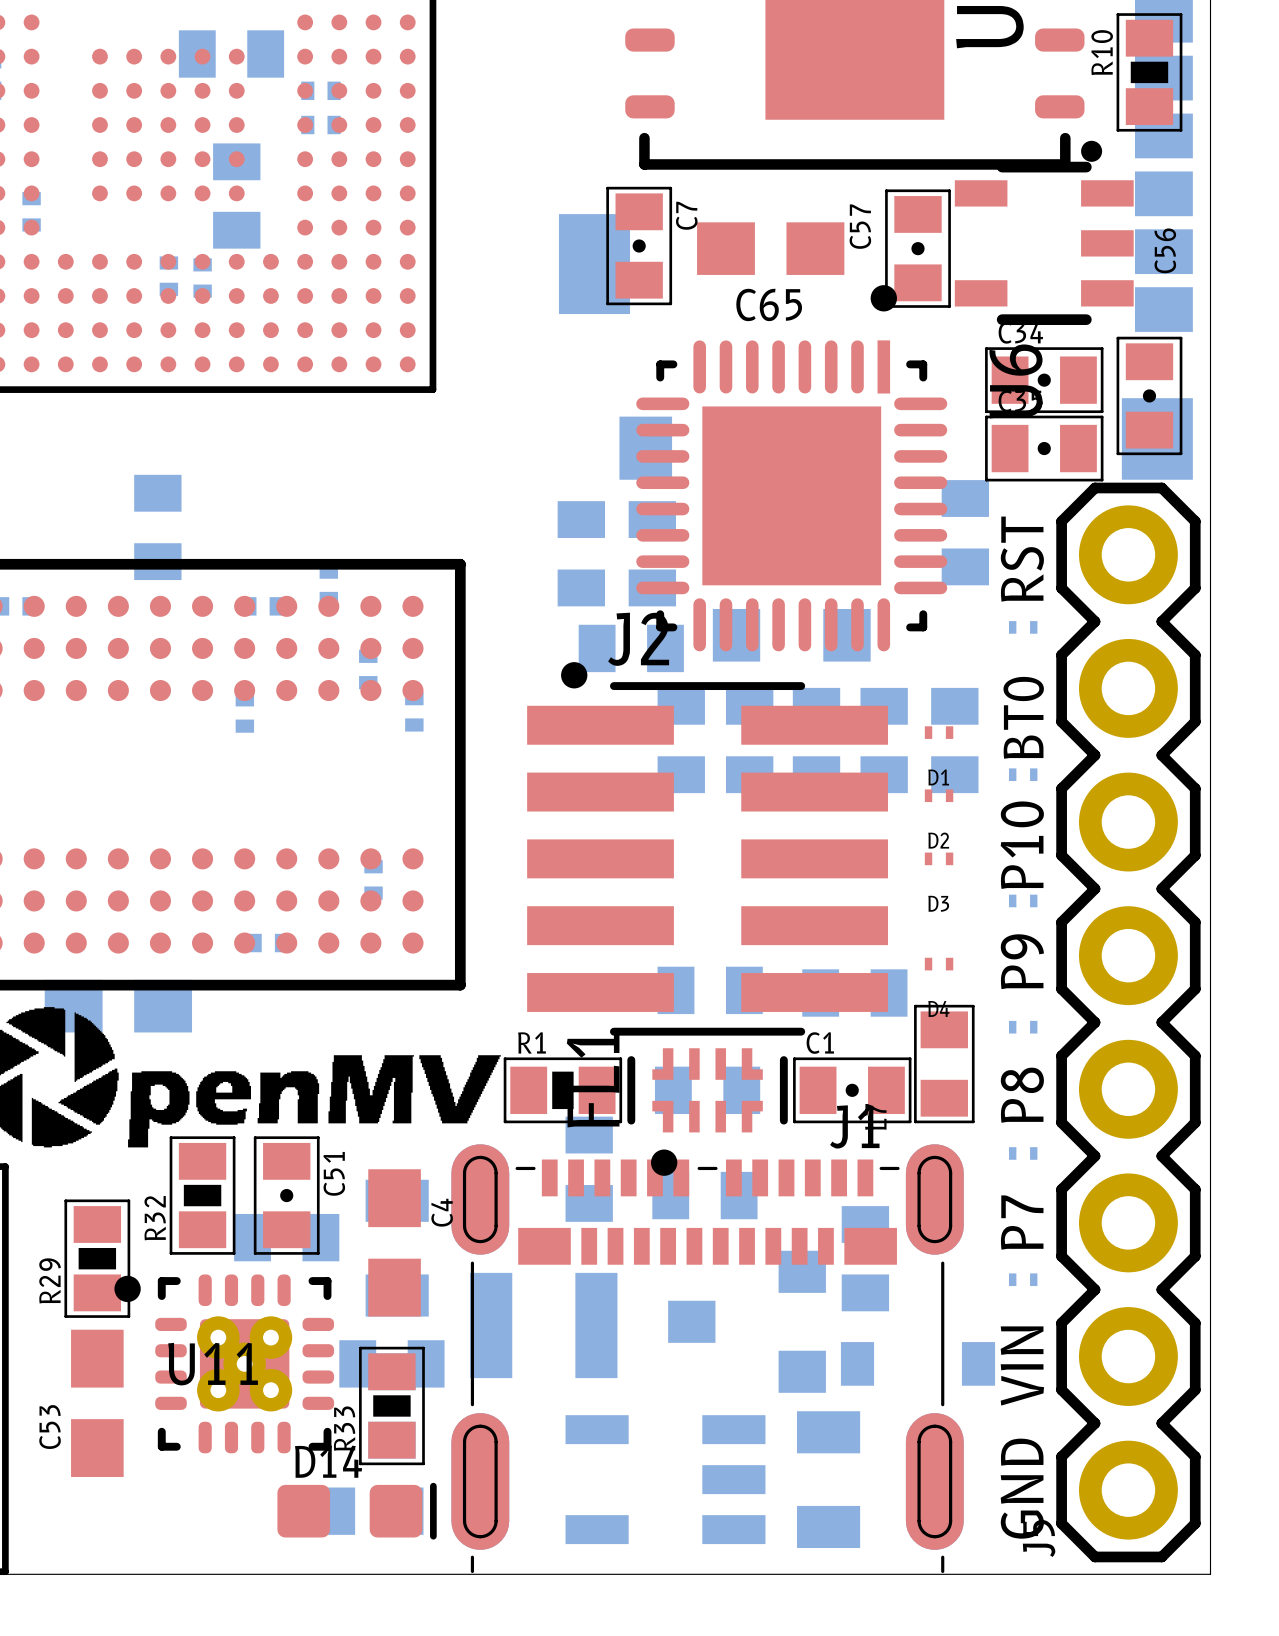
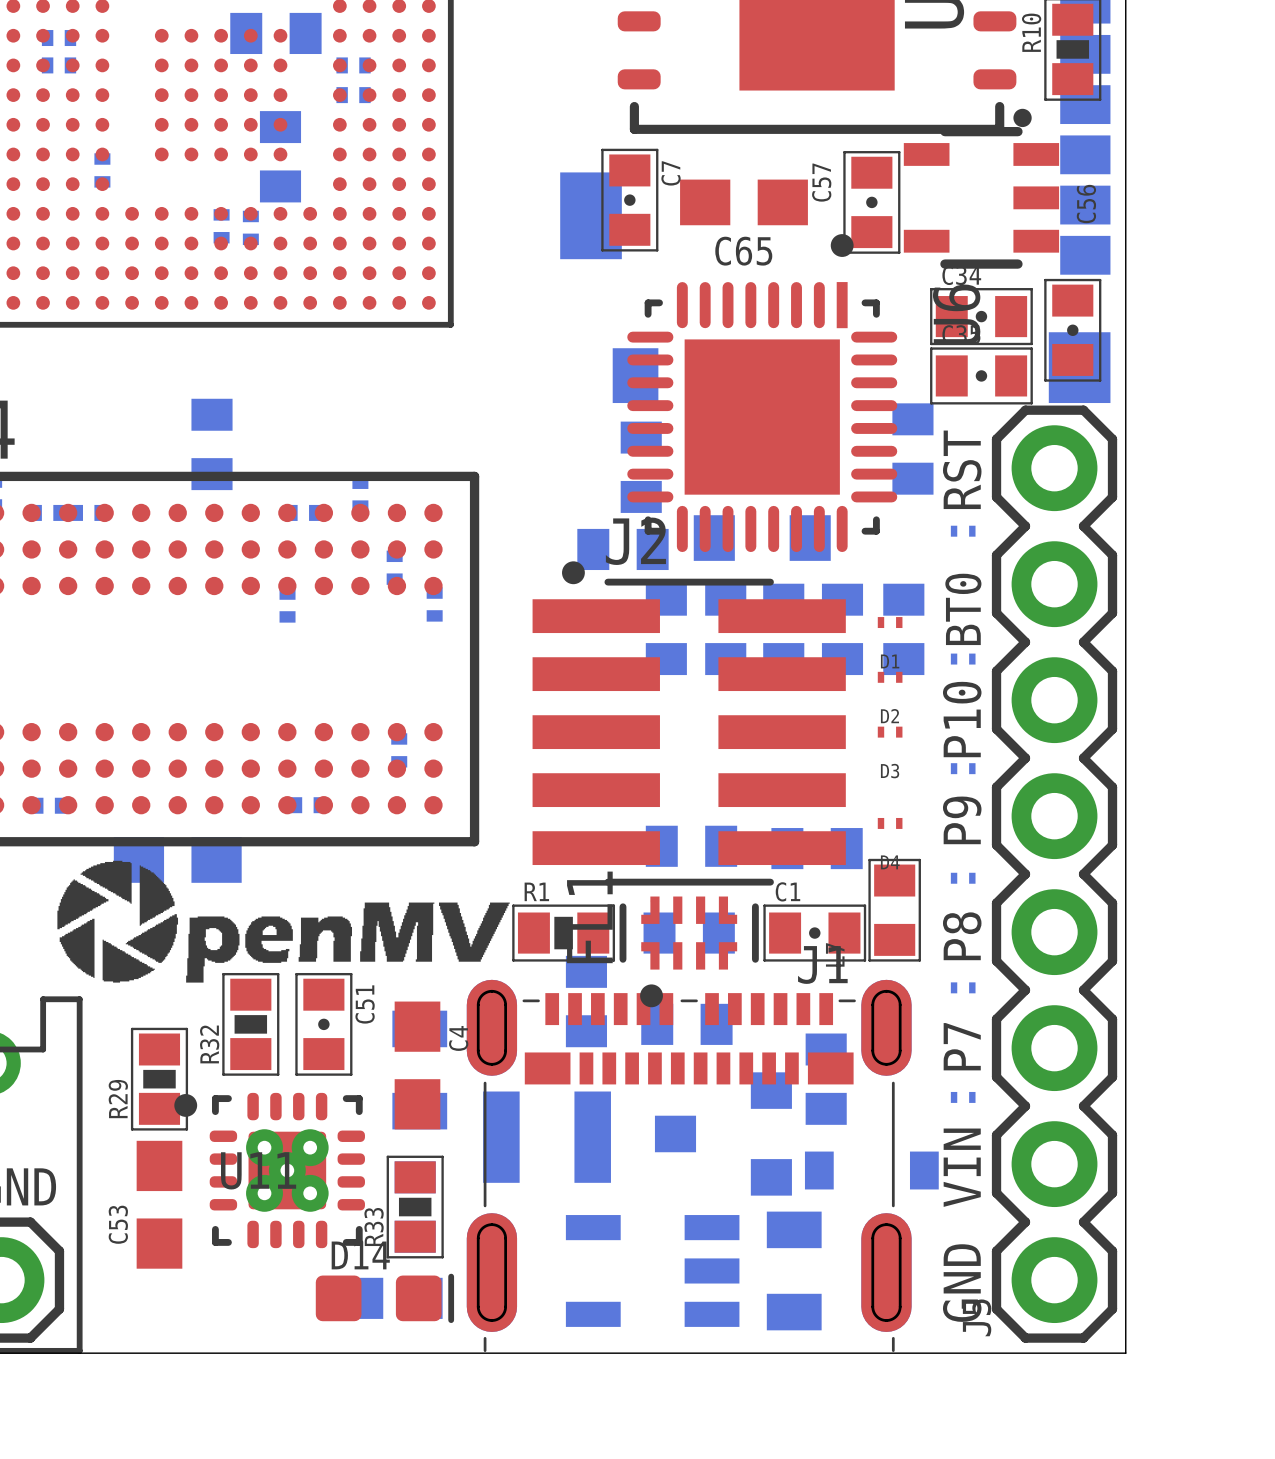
part: (581, 553) -> none
part: (286, 1237) -> none
part: (391, 1363) -> none

